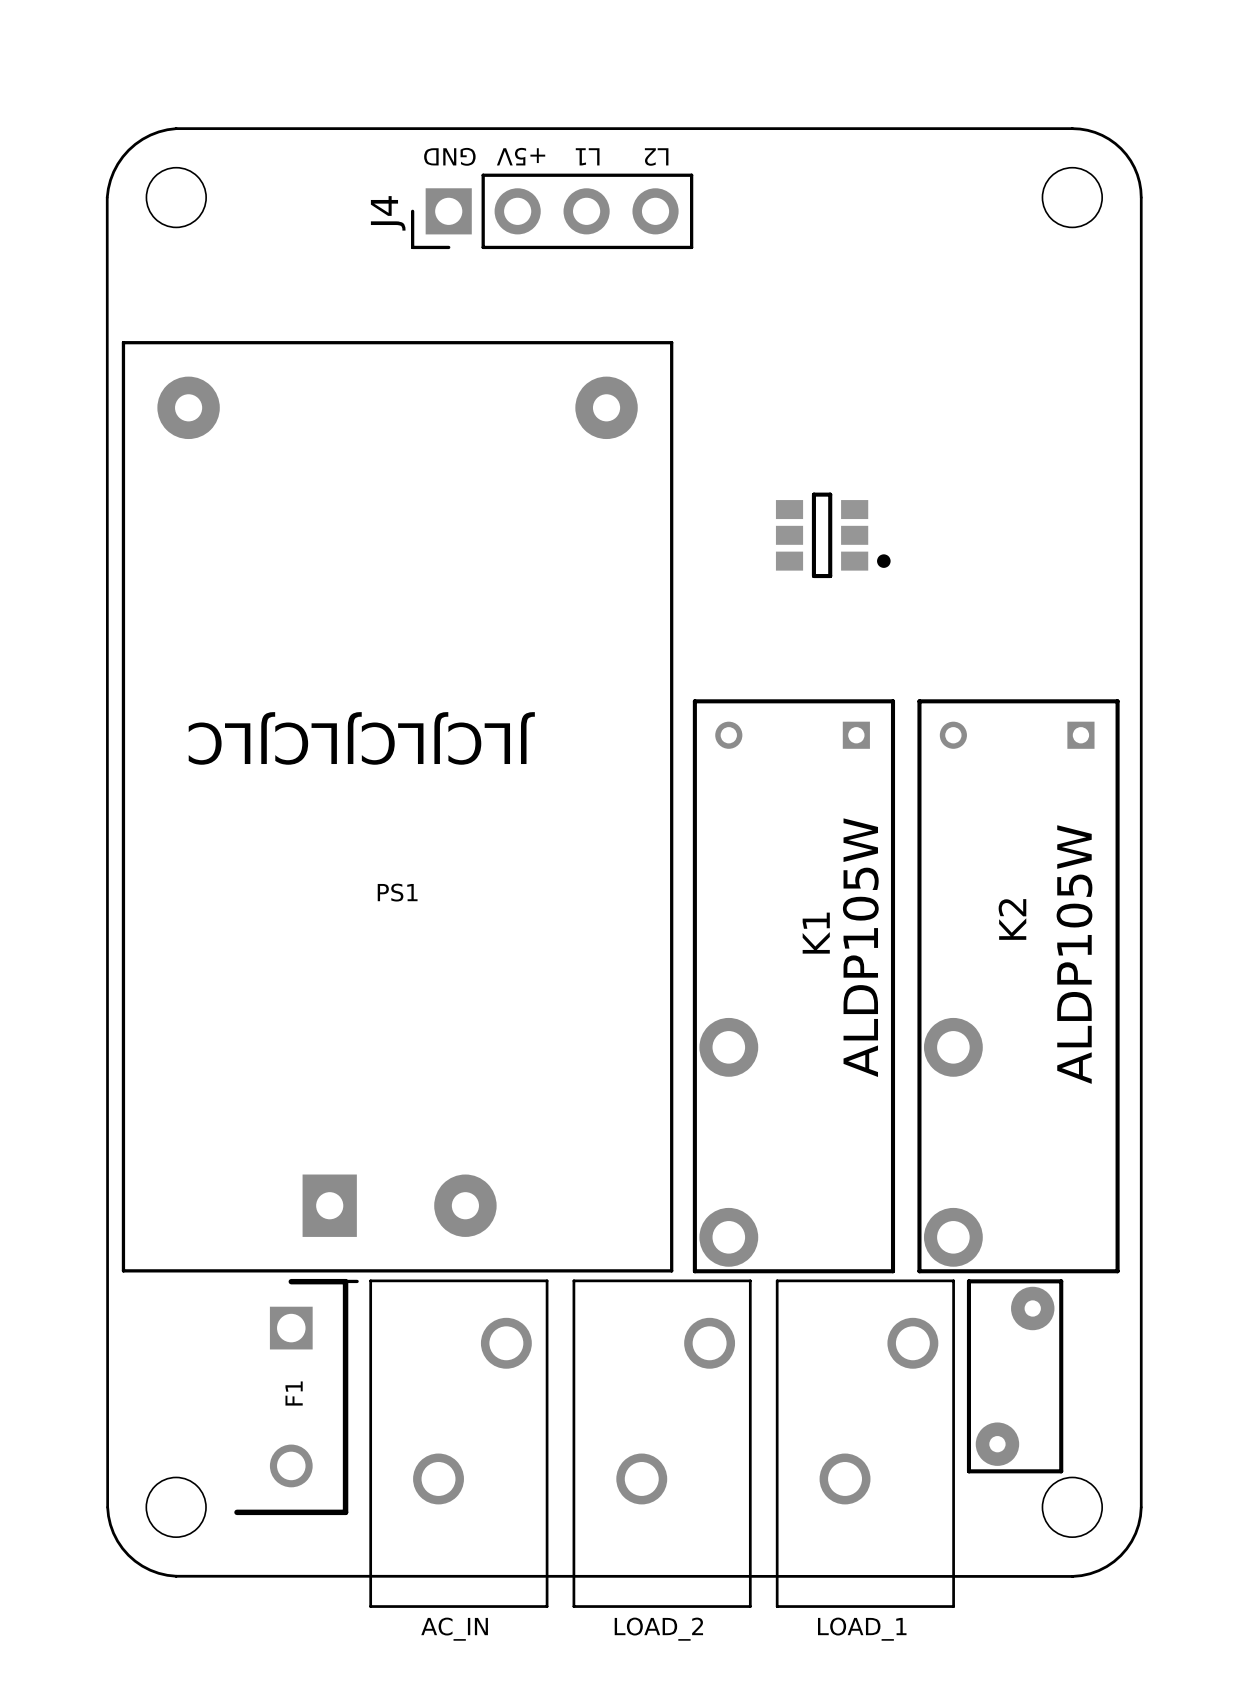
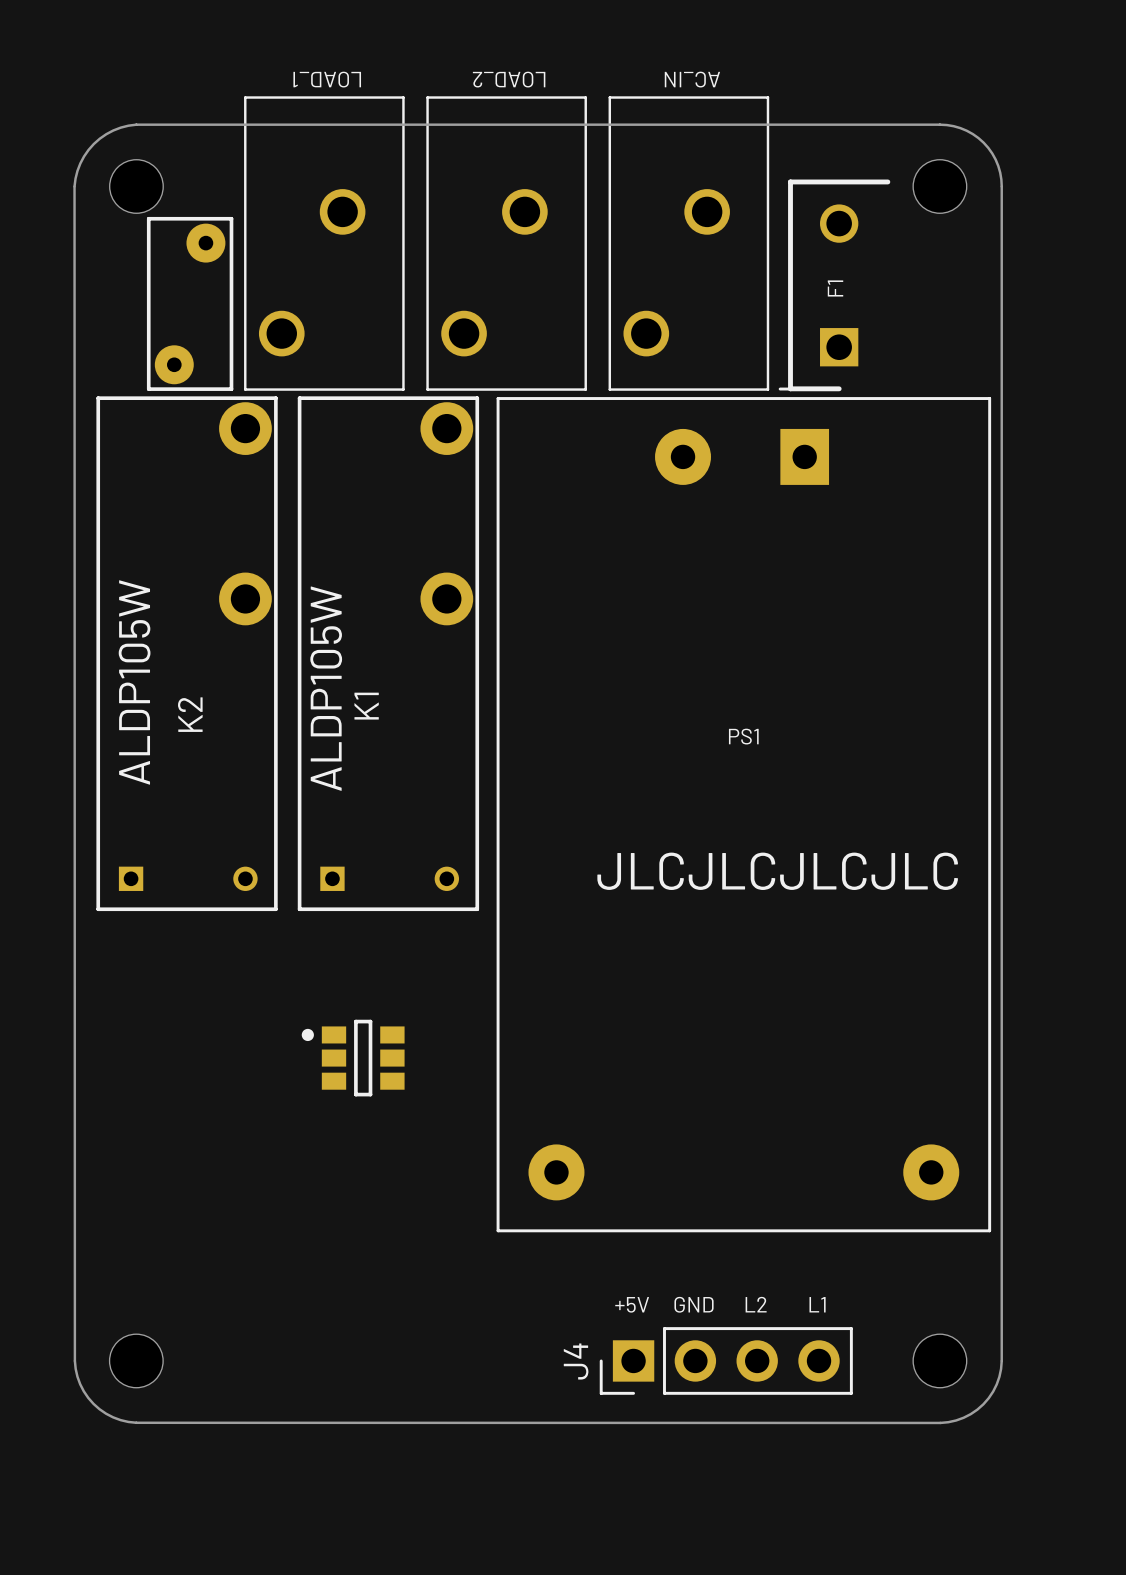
text: GND (449, 156) -> none
text: +5V (521, 156) -> none
text: L1 (587, 156) -> none
text: L2 (656, 156) -> none
J4 position: (552, 211) -> (726, 1360)
part: none -> LOAD_1 (324, 243)
part: none -> LOAD_2 (506, 243)
part: none -> AC_IN (688, 243)
part: none -> (190, 303)
part: (833, 535) -> none
text rotation: 0° (361, 738) -> 180° (777, 871)
text position: JLCJLCJLCJLC (361, 738) -> JLCJLCJLCJLC (777, 871)
PS1 rotation: 0° (397, 812) -> 180° (743, 809)
K1 rotation: 0° (793, 986) -> 180° (388, 653)
K1 position: (793, 986) -> (388, 653)
K2 rotation: 0° (1018, 986) -> 180° (187, 653)
K2 position: (1018, 986) -> (187, 653)
part: none -> (353, 1058)
part: (1015, 1376) -> none
F1 rotation: 0° (291, 1397) -> 180° (839, 285)
F1 position: (291, 1397) -> (839, 285)
part: AC_IN (458, 1443) -> none
part: LOAD_2 (662, 1443) -> none
part: LOAD_1 (865, 1443) -> none
text: none -> +5V (632, 1304)
text: none -> GND (694, 1304)
text: none -> L2 (756, 1304)
text: none -> L1 (817, 1304)

